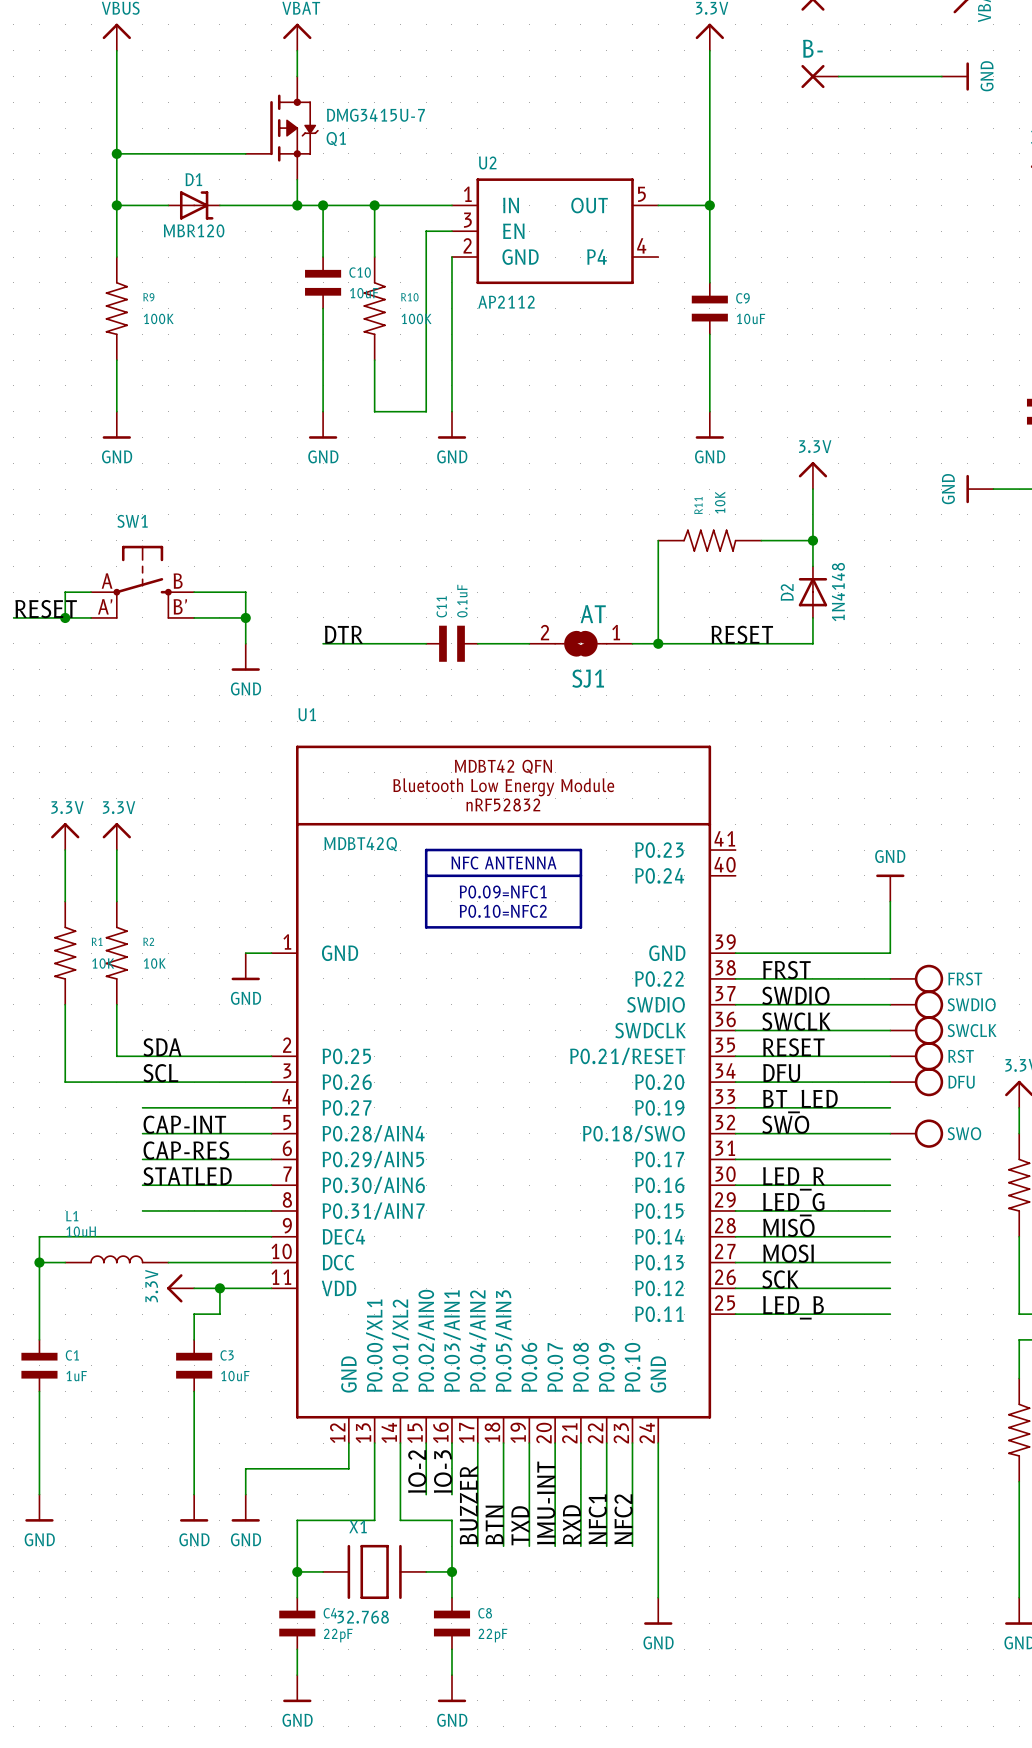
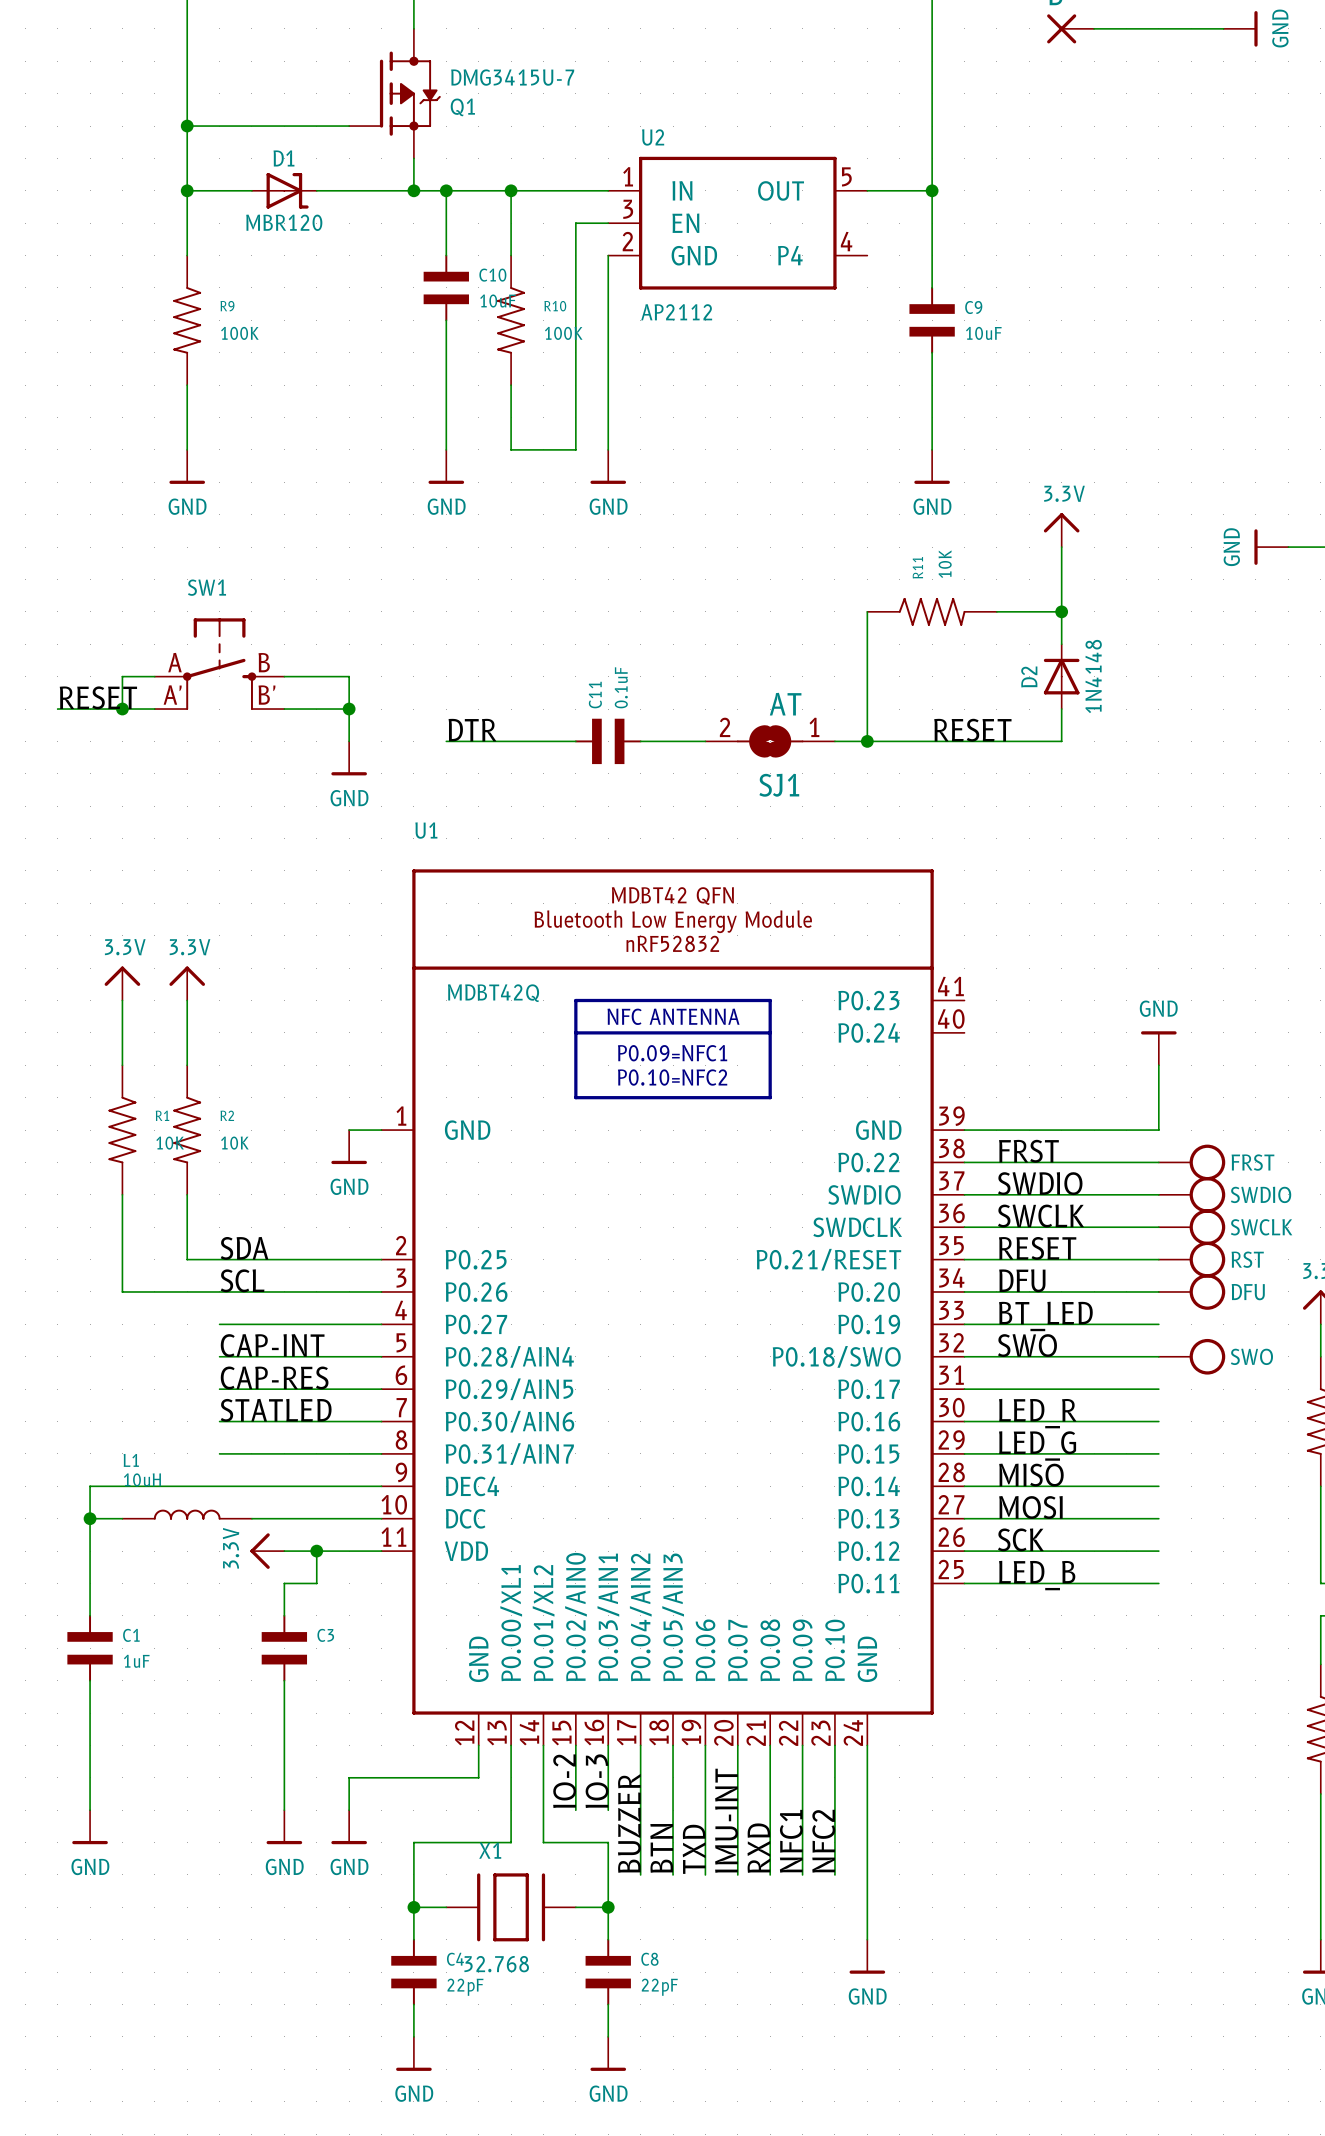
C3 value: 10uF (235, 1376) -> none

